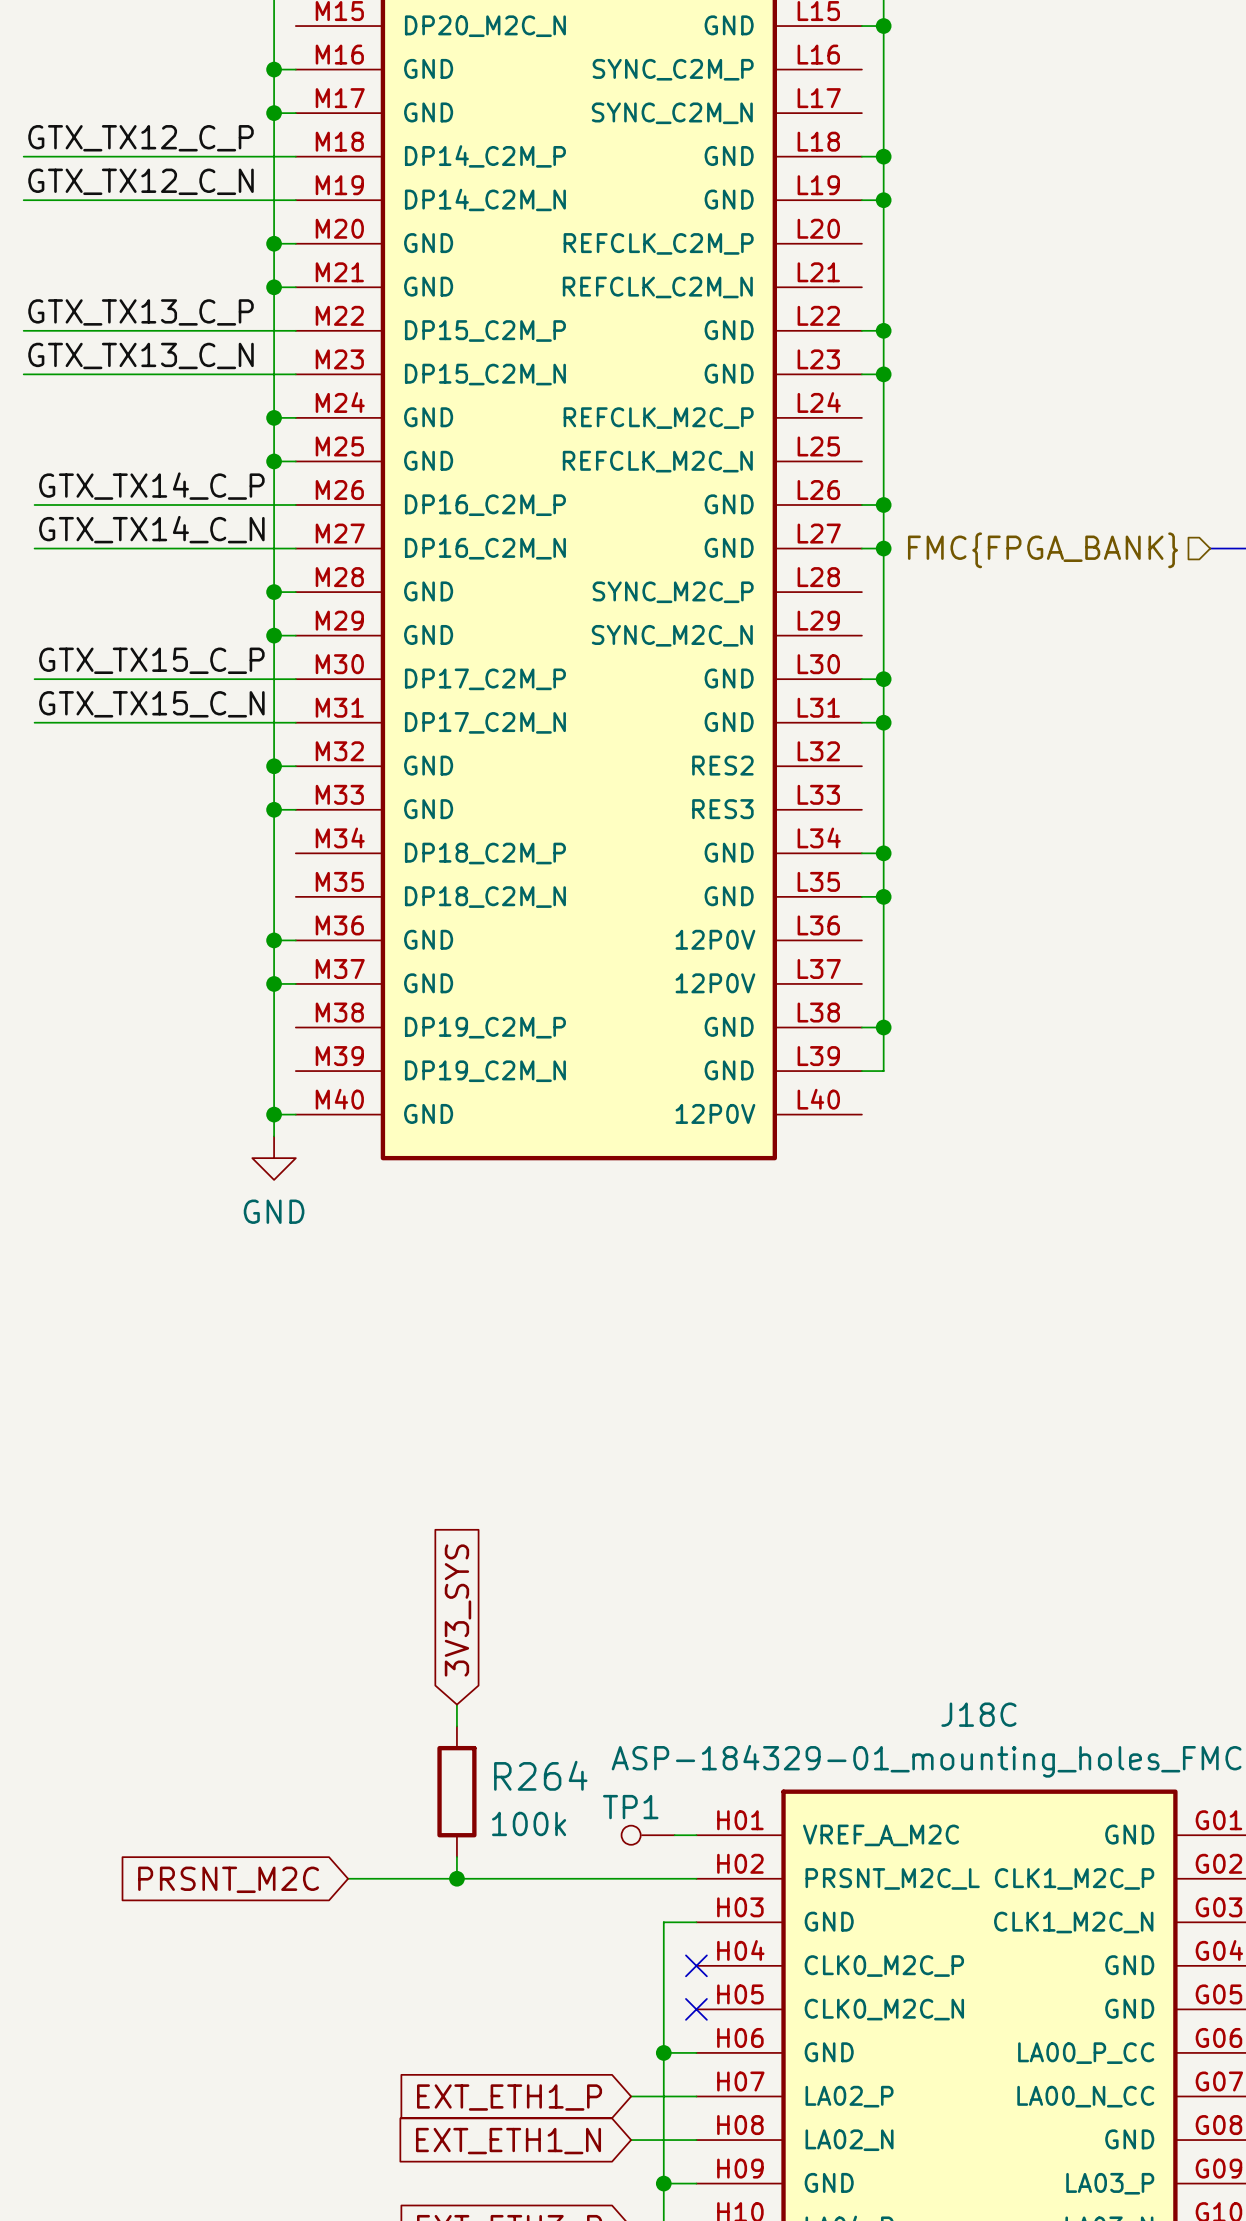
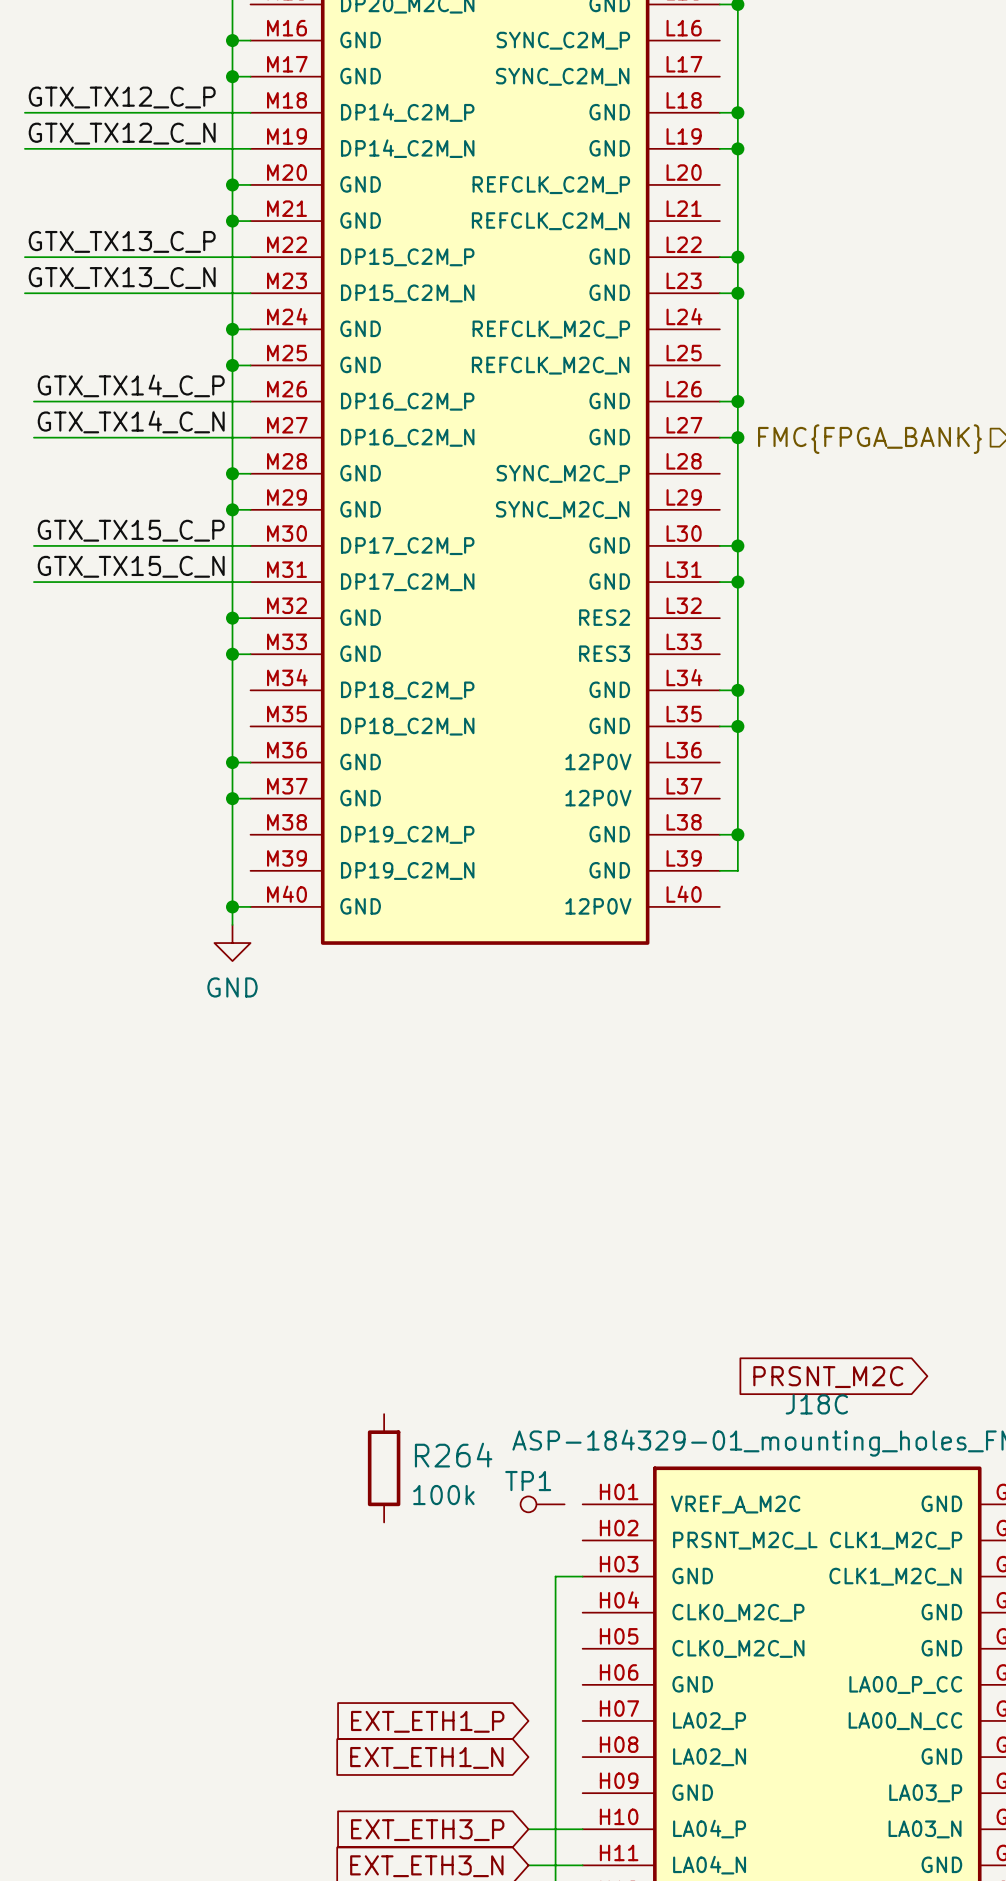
global label: 3V3_SYS (457, 1610) -> none
global label: none -> PRSNT_M2C (828, 1377)
wire: (456, 1704) (456, 1726) -> none
wire: (674, 1835) (696, 1835) -> none
wire: (456, 1857) (456, 1878) -> none
wire: (348, 1878) (696, 1878) -> none
junction: (456, 1878) -> none
global label: PRSNT_M2C (228, 1879) -> none
no-connect mark: (696, 1965) -> none
no-connect mark: (696, 2009) -> none
wire: (663, 2052) (696, 2052) -> none
junction: (663, 2052) -> none
wire: (631, 2096) (696, 2096) -> none
wire: (631, 2140) (696, 2140) -> none
wire: (663, 2183) (696, 2183) -> none
junction: (663, 2183) -> none

